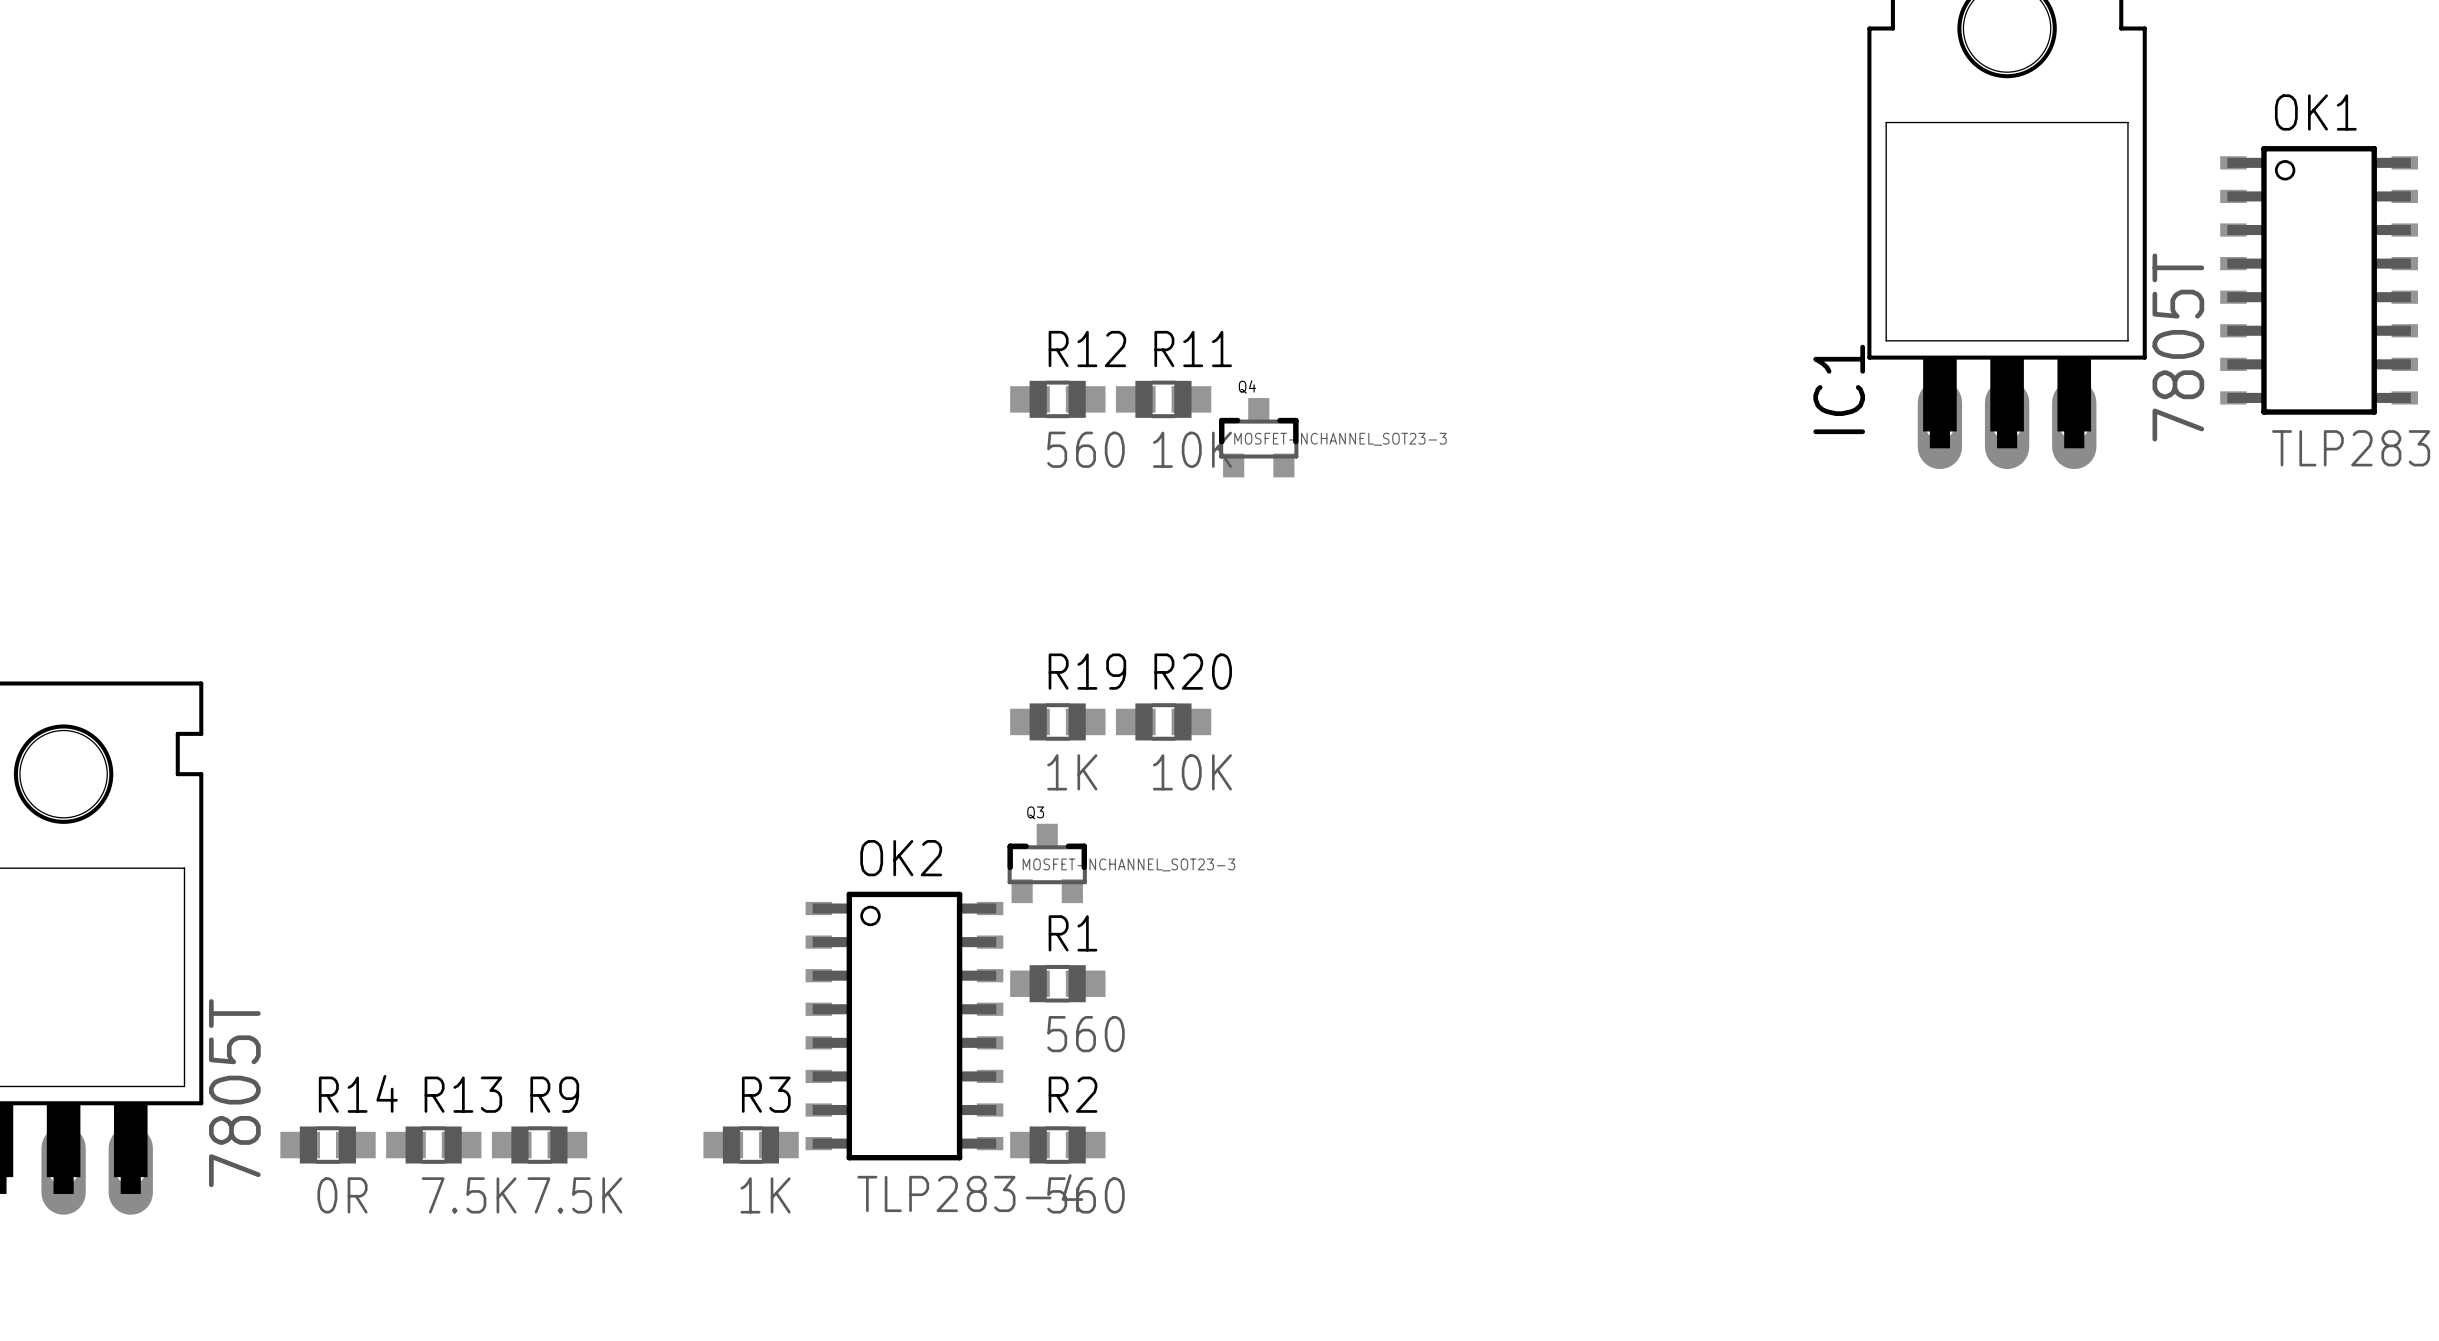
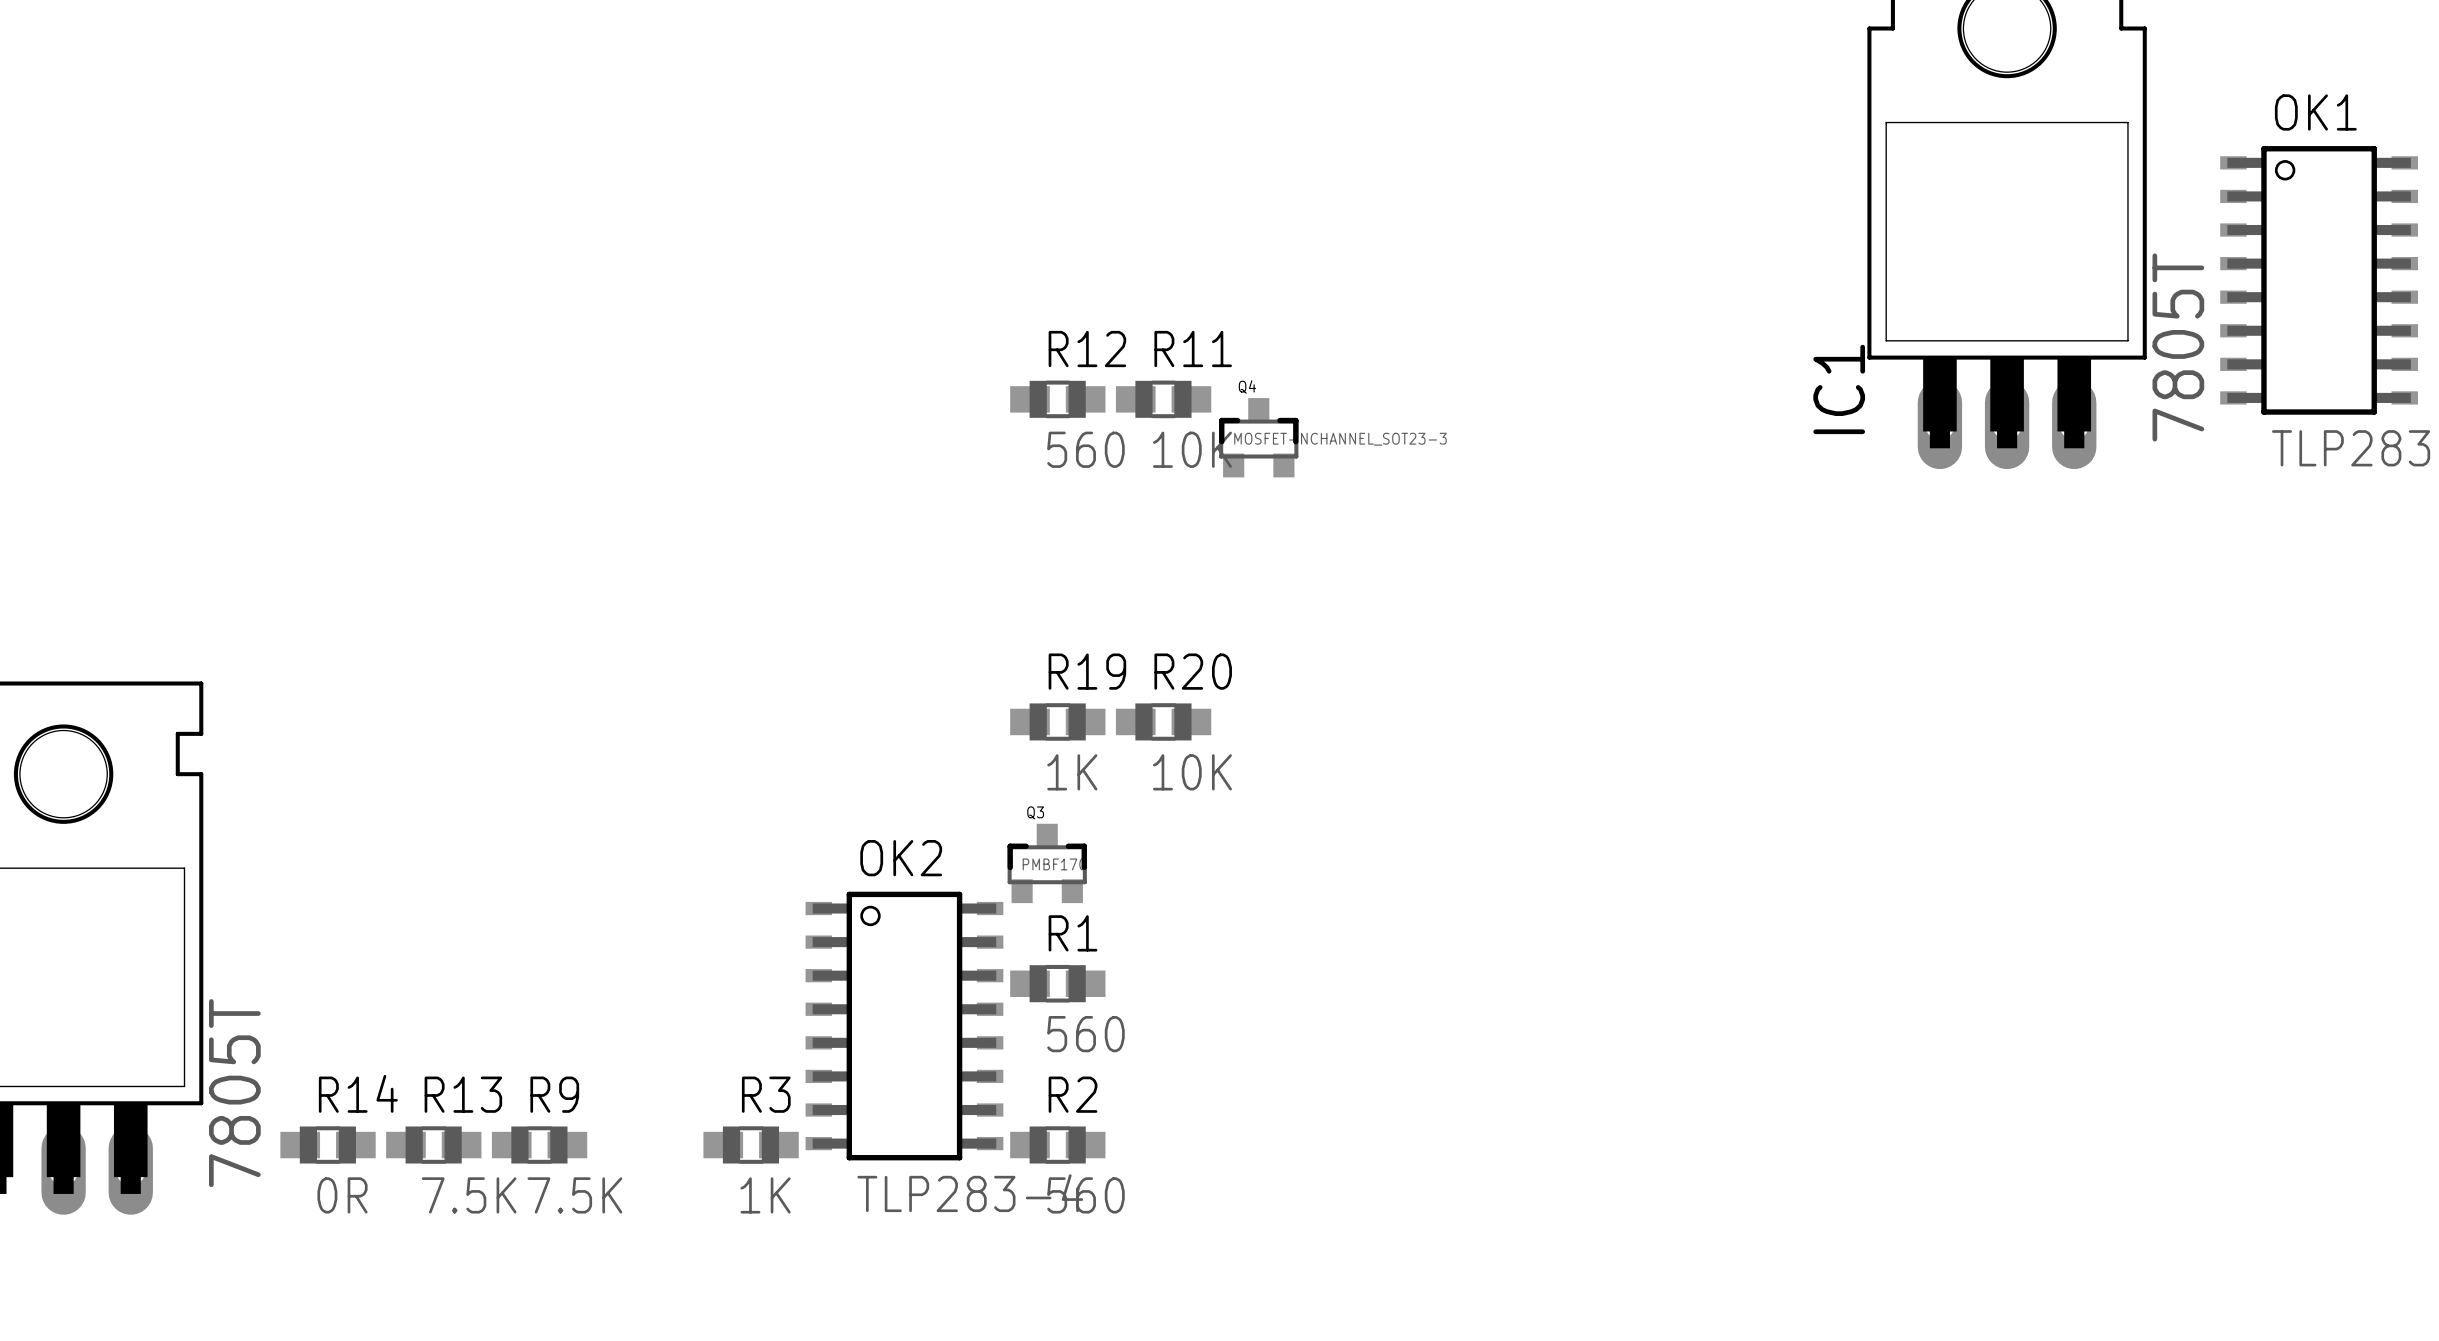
Q3 value: MOSFET-NCHANNEL_SOT23-3 (1128, 864) -> PMBF170 (1054, 864)

